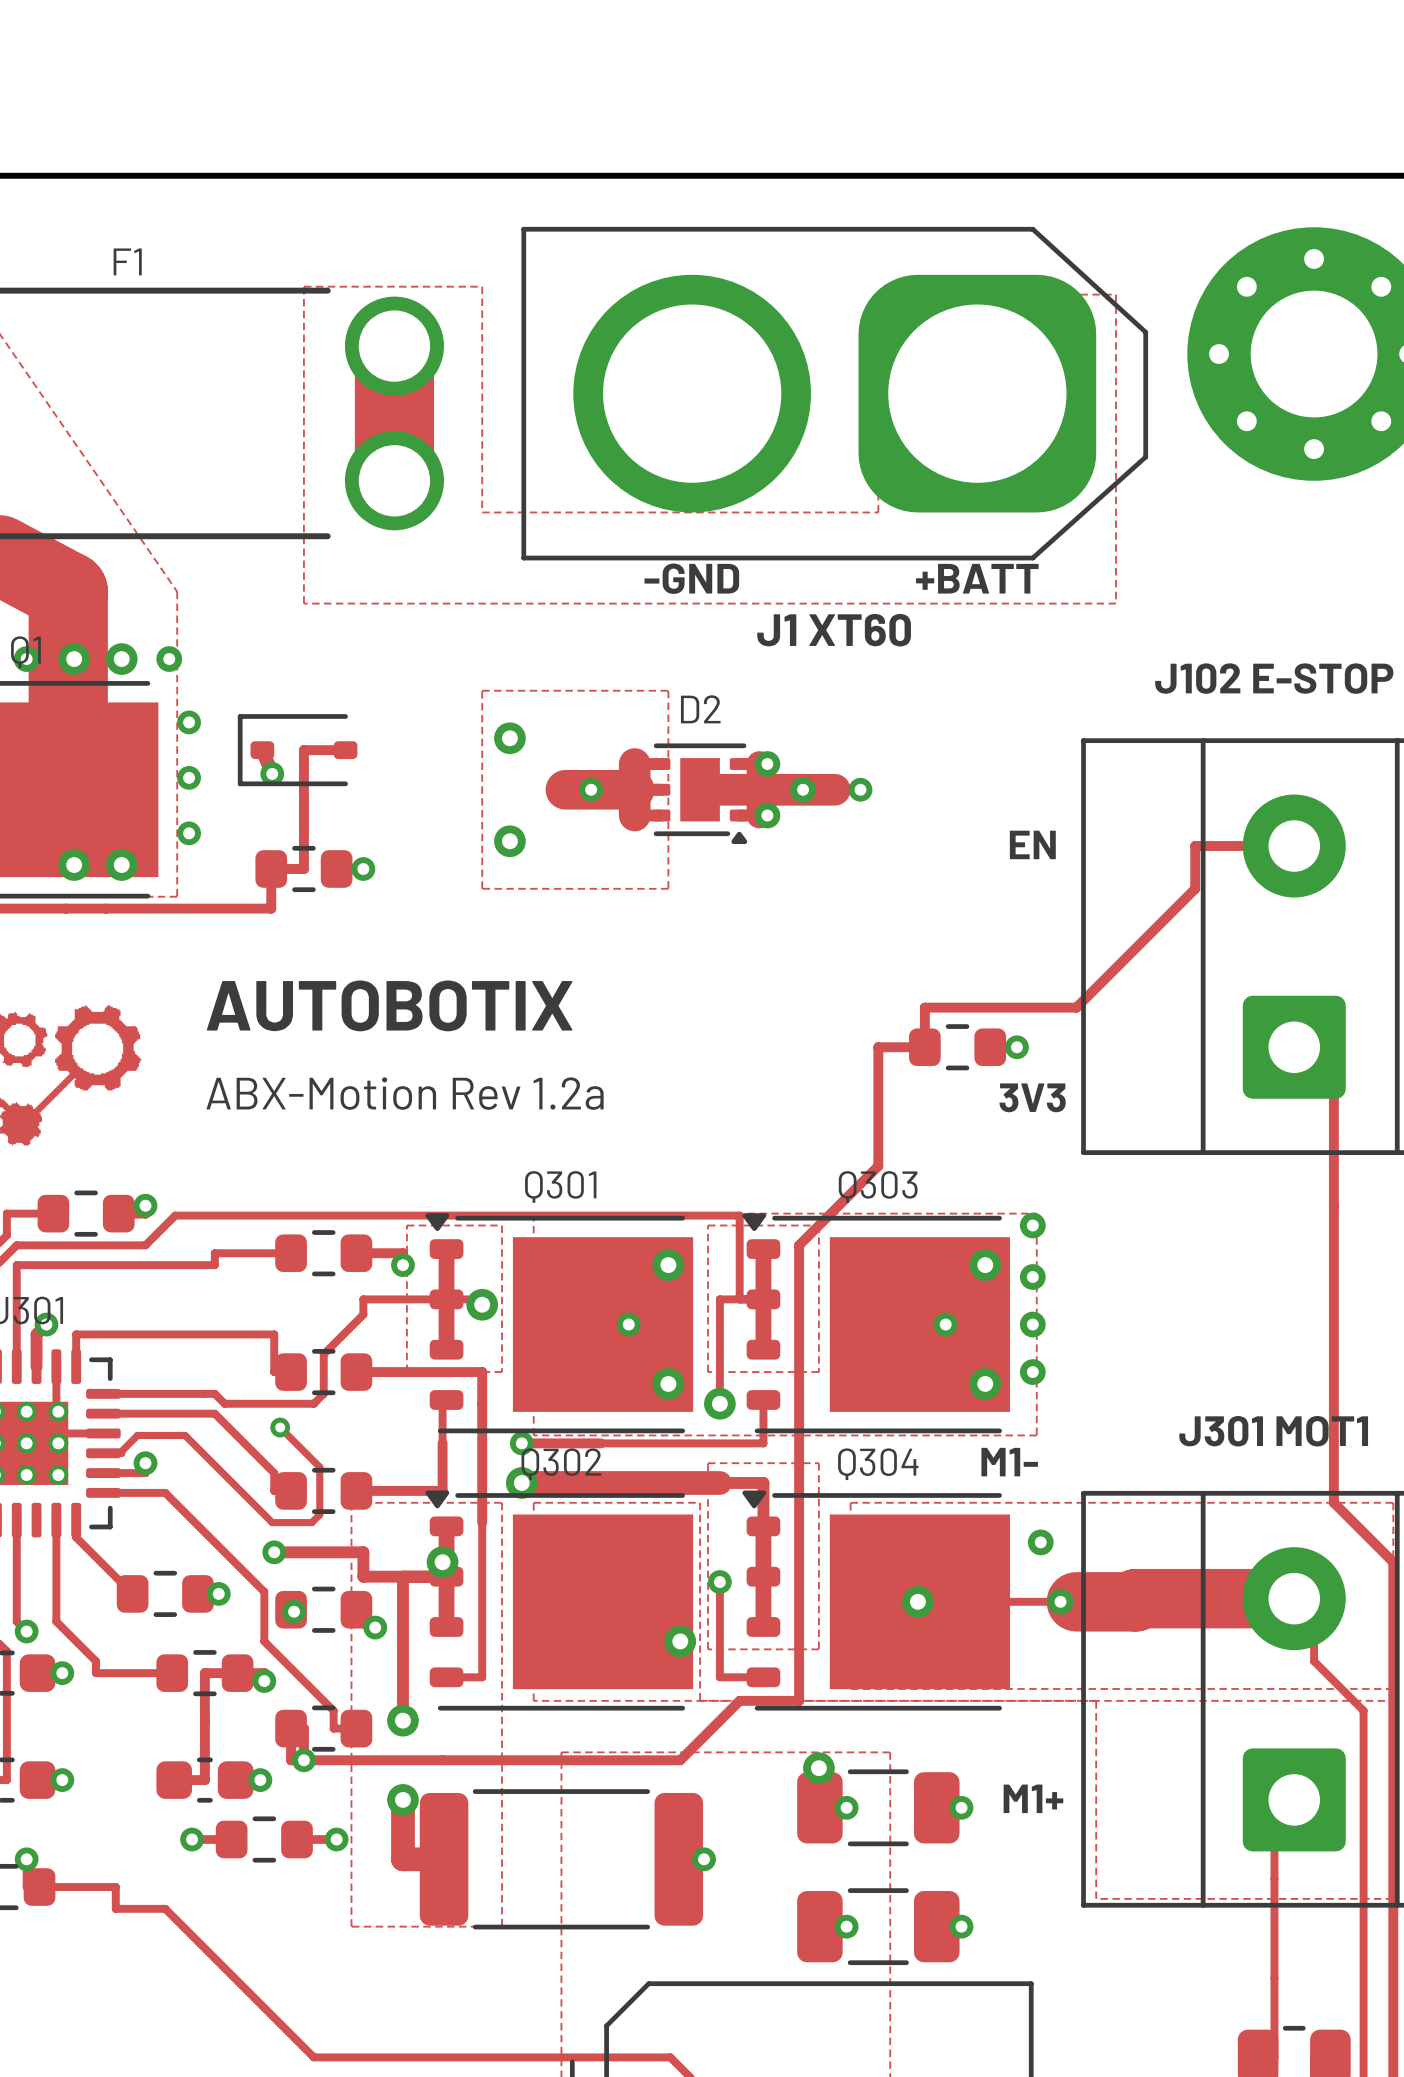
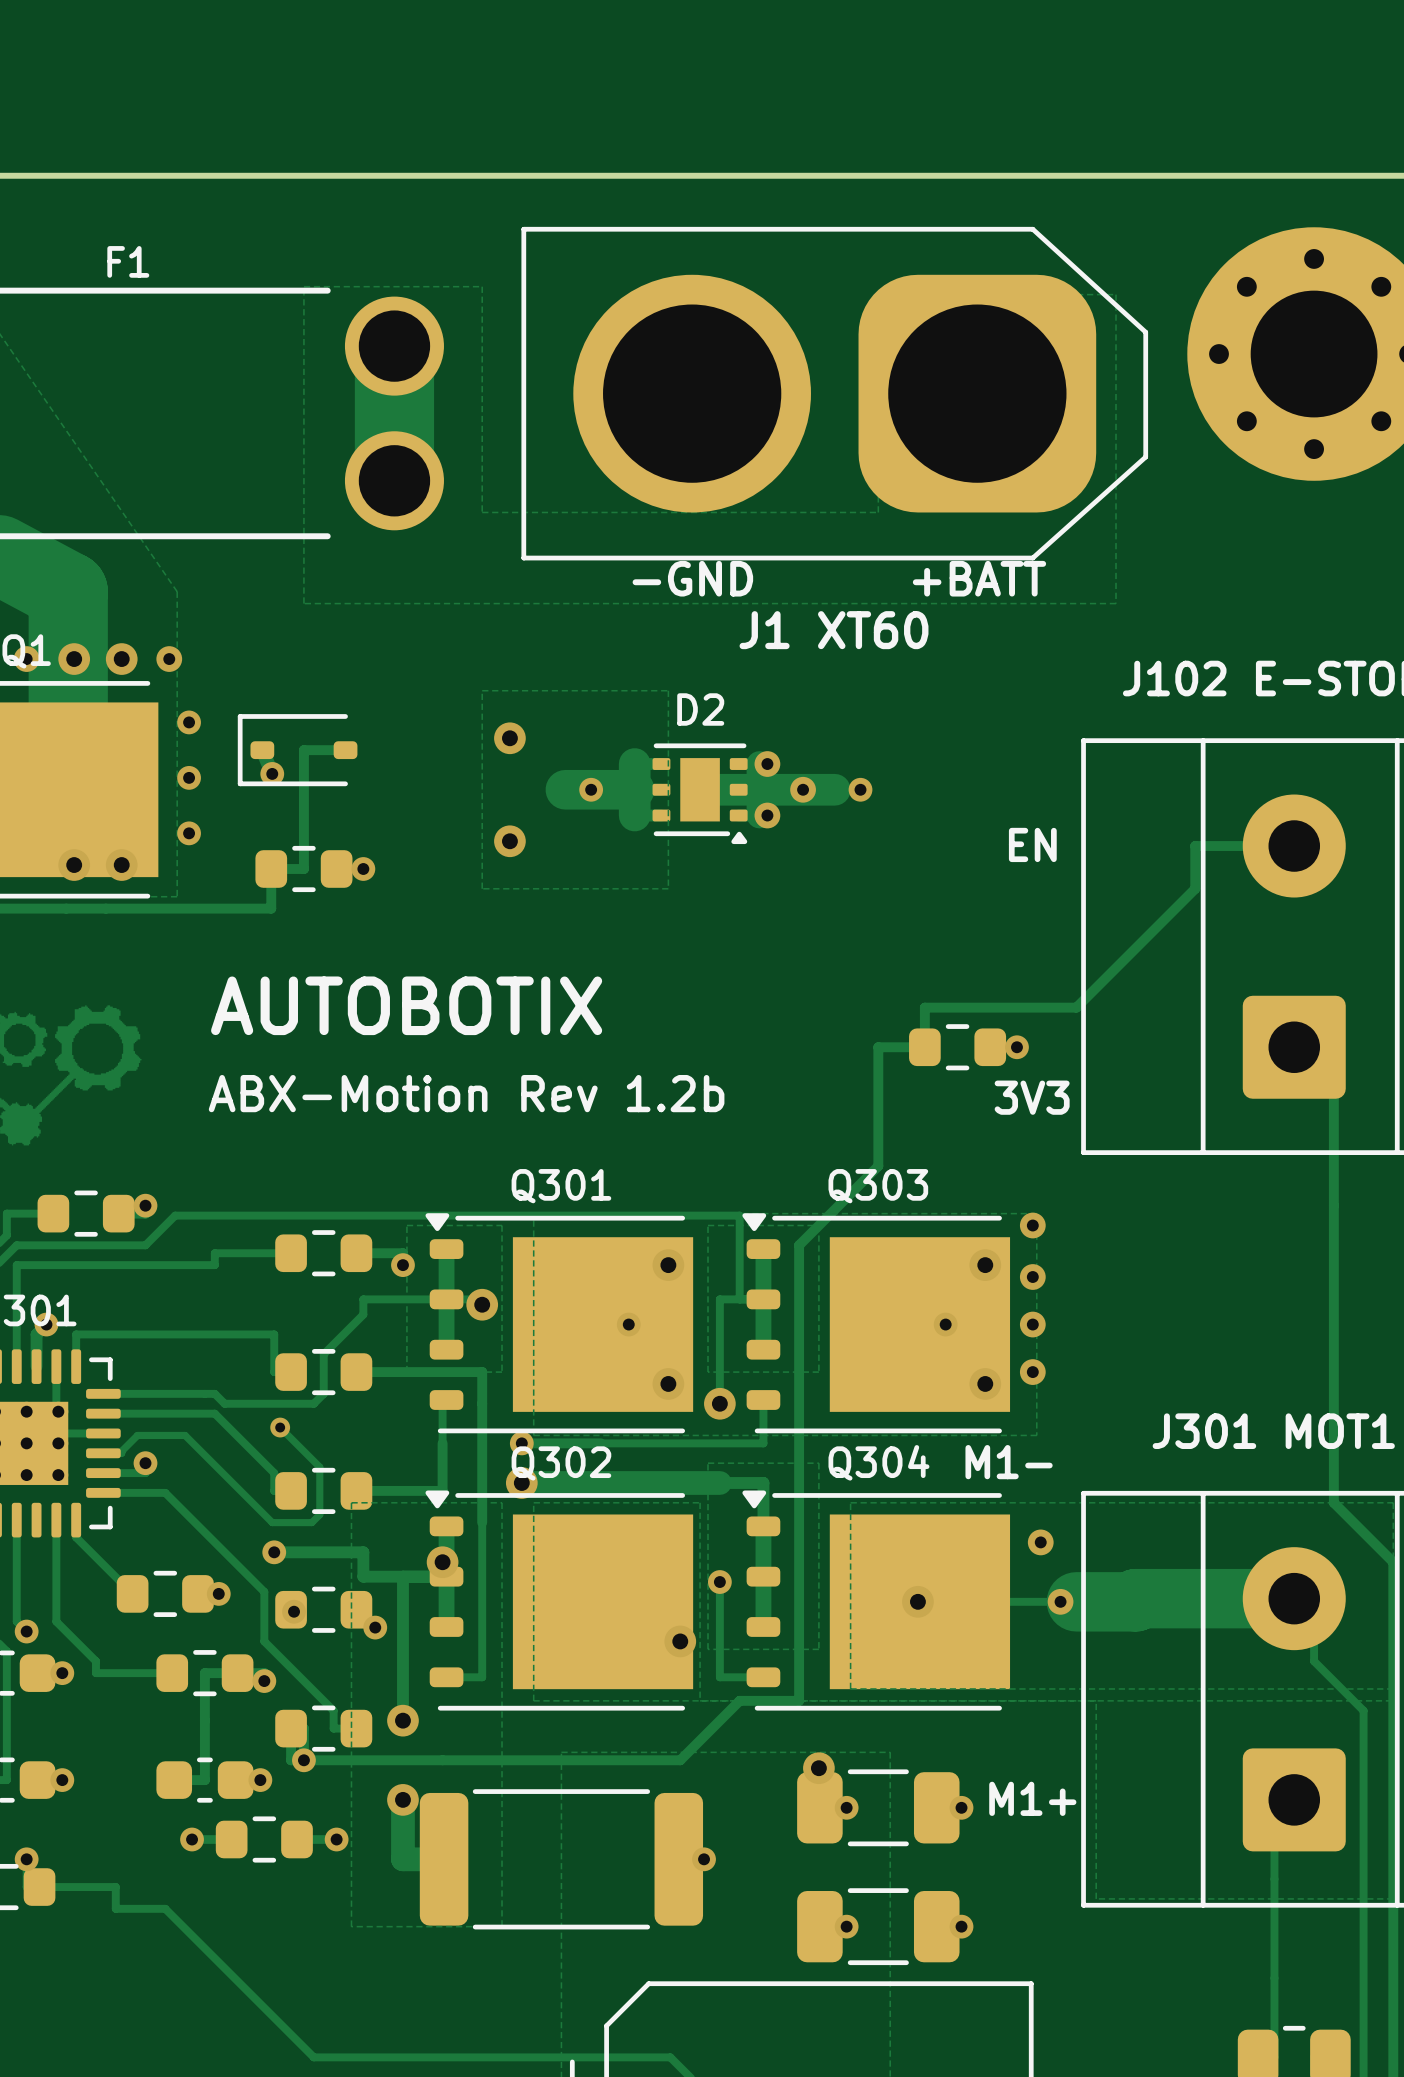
text: ABX-Motion Rev 1.2a (405, 1093) -> ABX-Motion Rev 1.2b (466, 1093)

